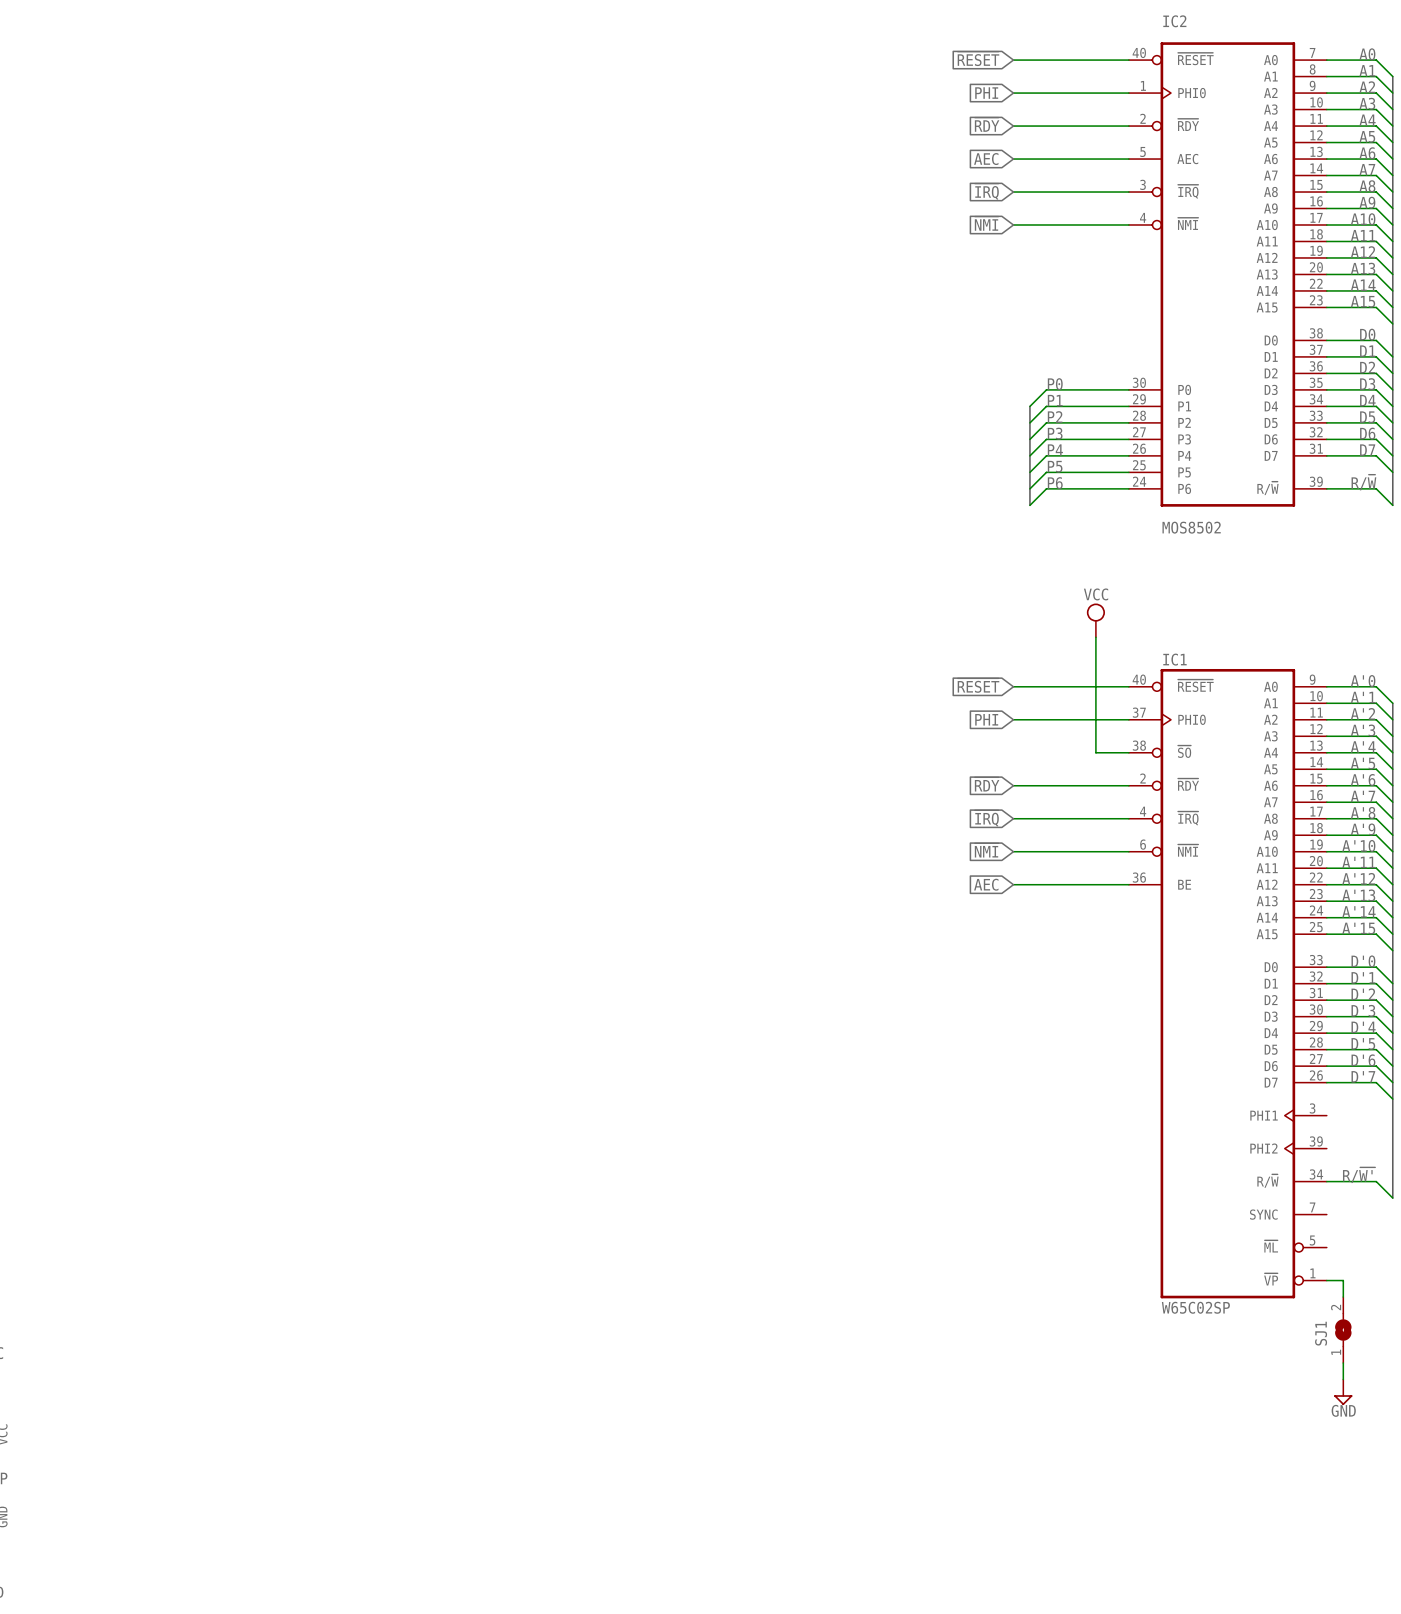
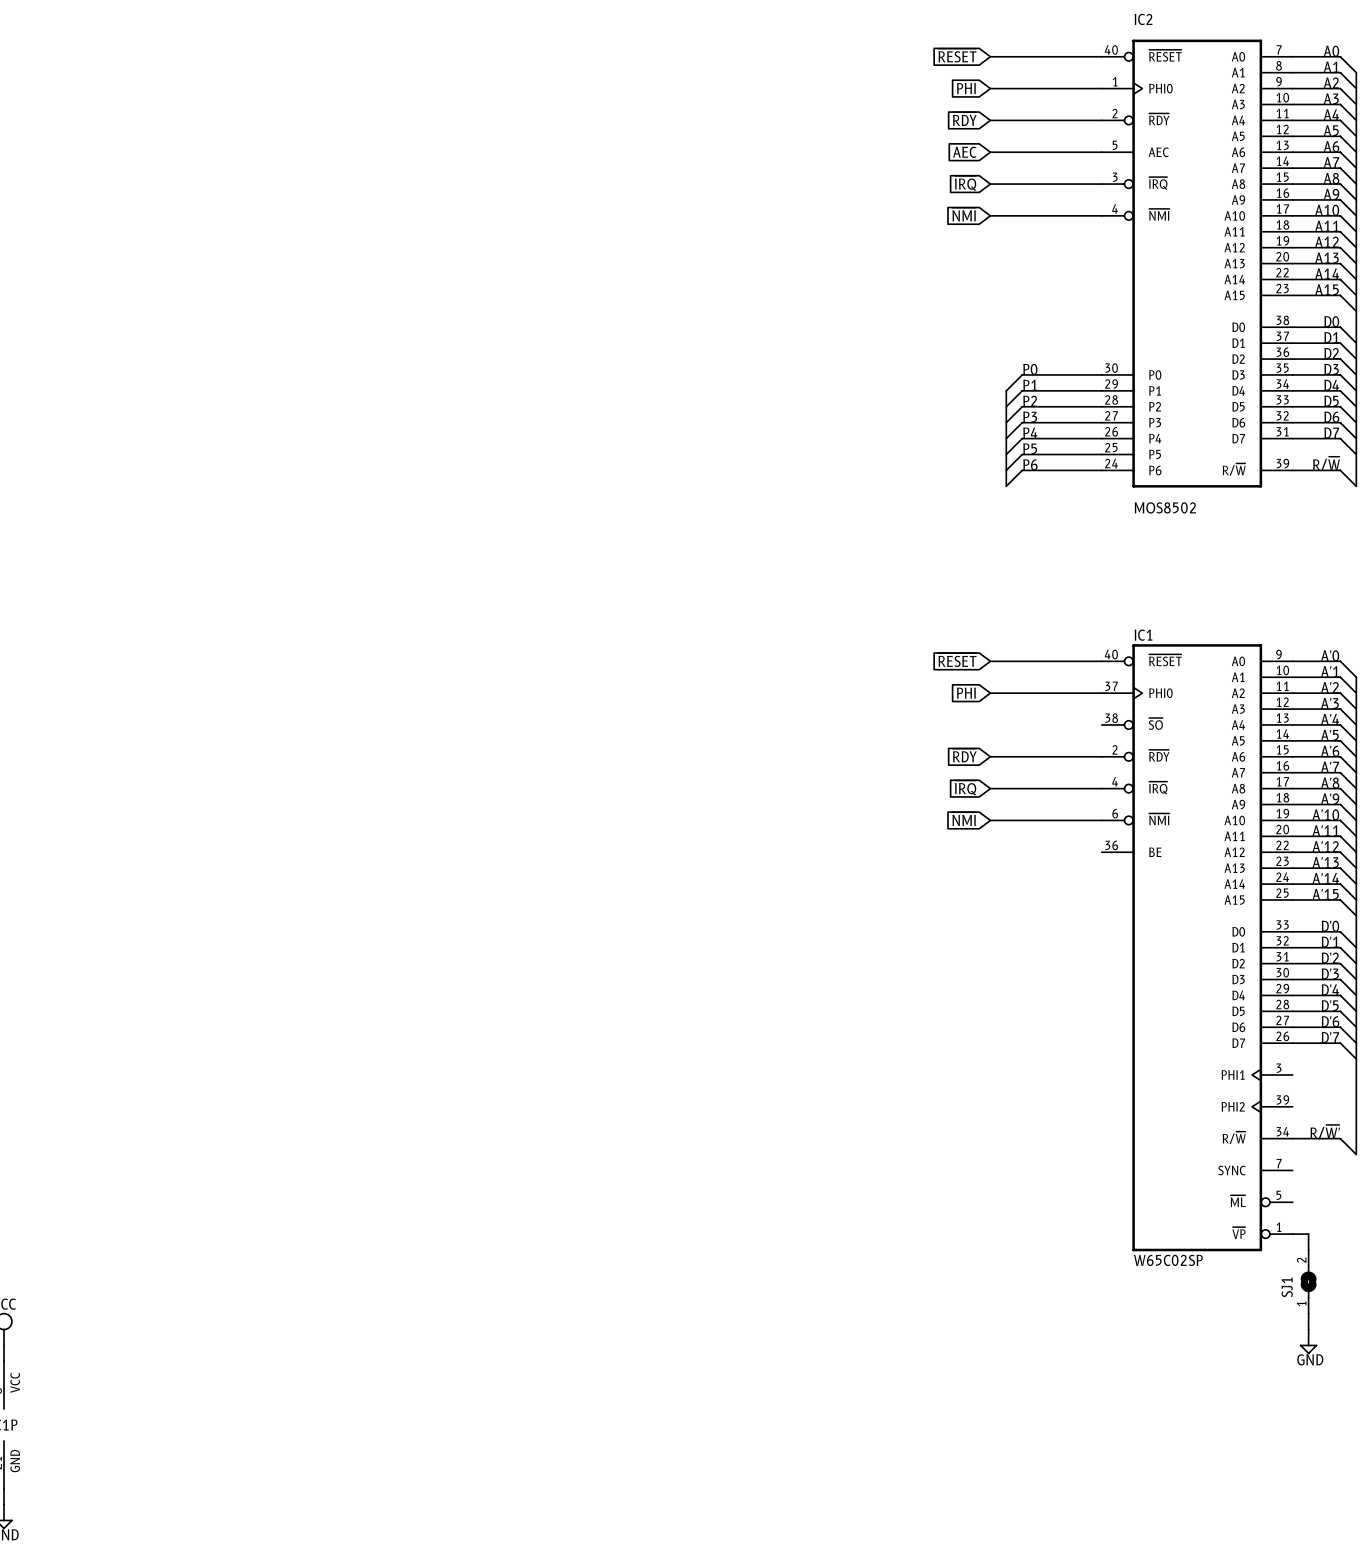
power symbol: VCC (1095, 620) -> none
wire: (1095, 637) (1095, 752) (1128, 752) -> none
global label: AEC (986, 884) -> none
wire: (1013, 884) (1128, 884) -> none

